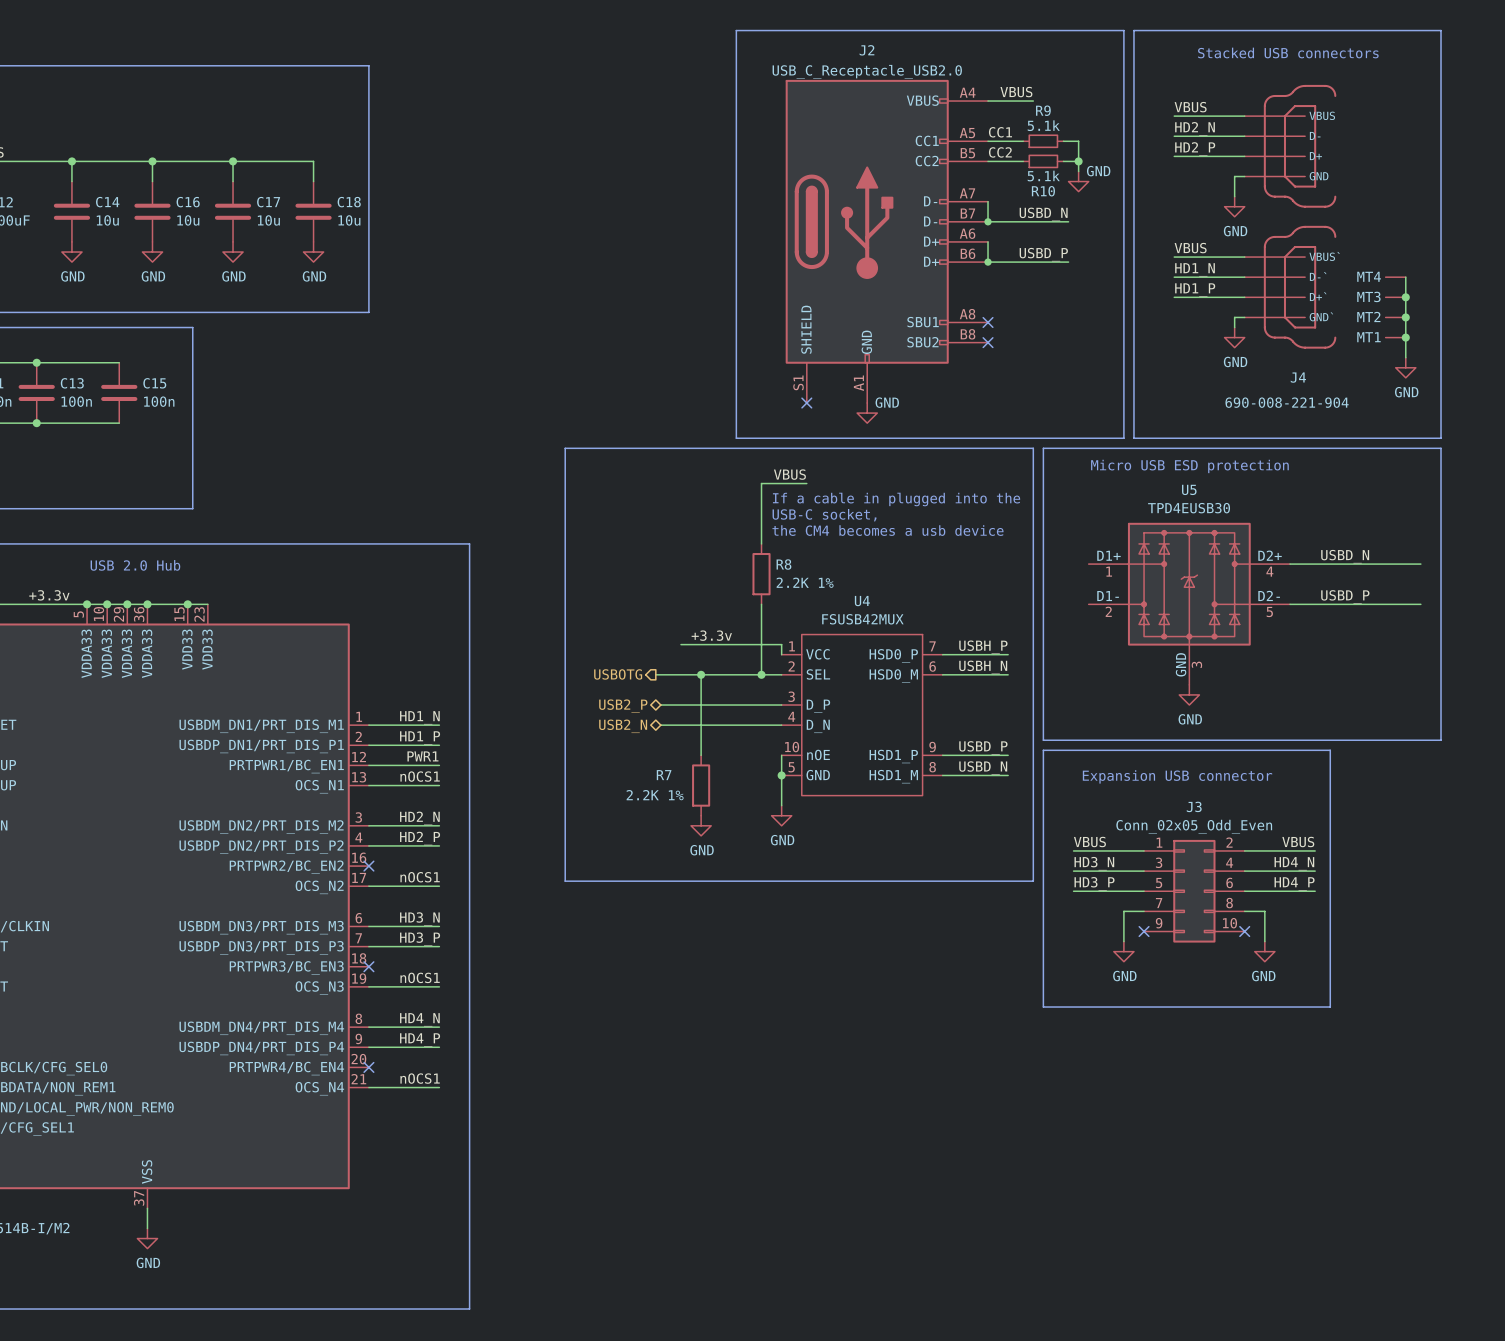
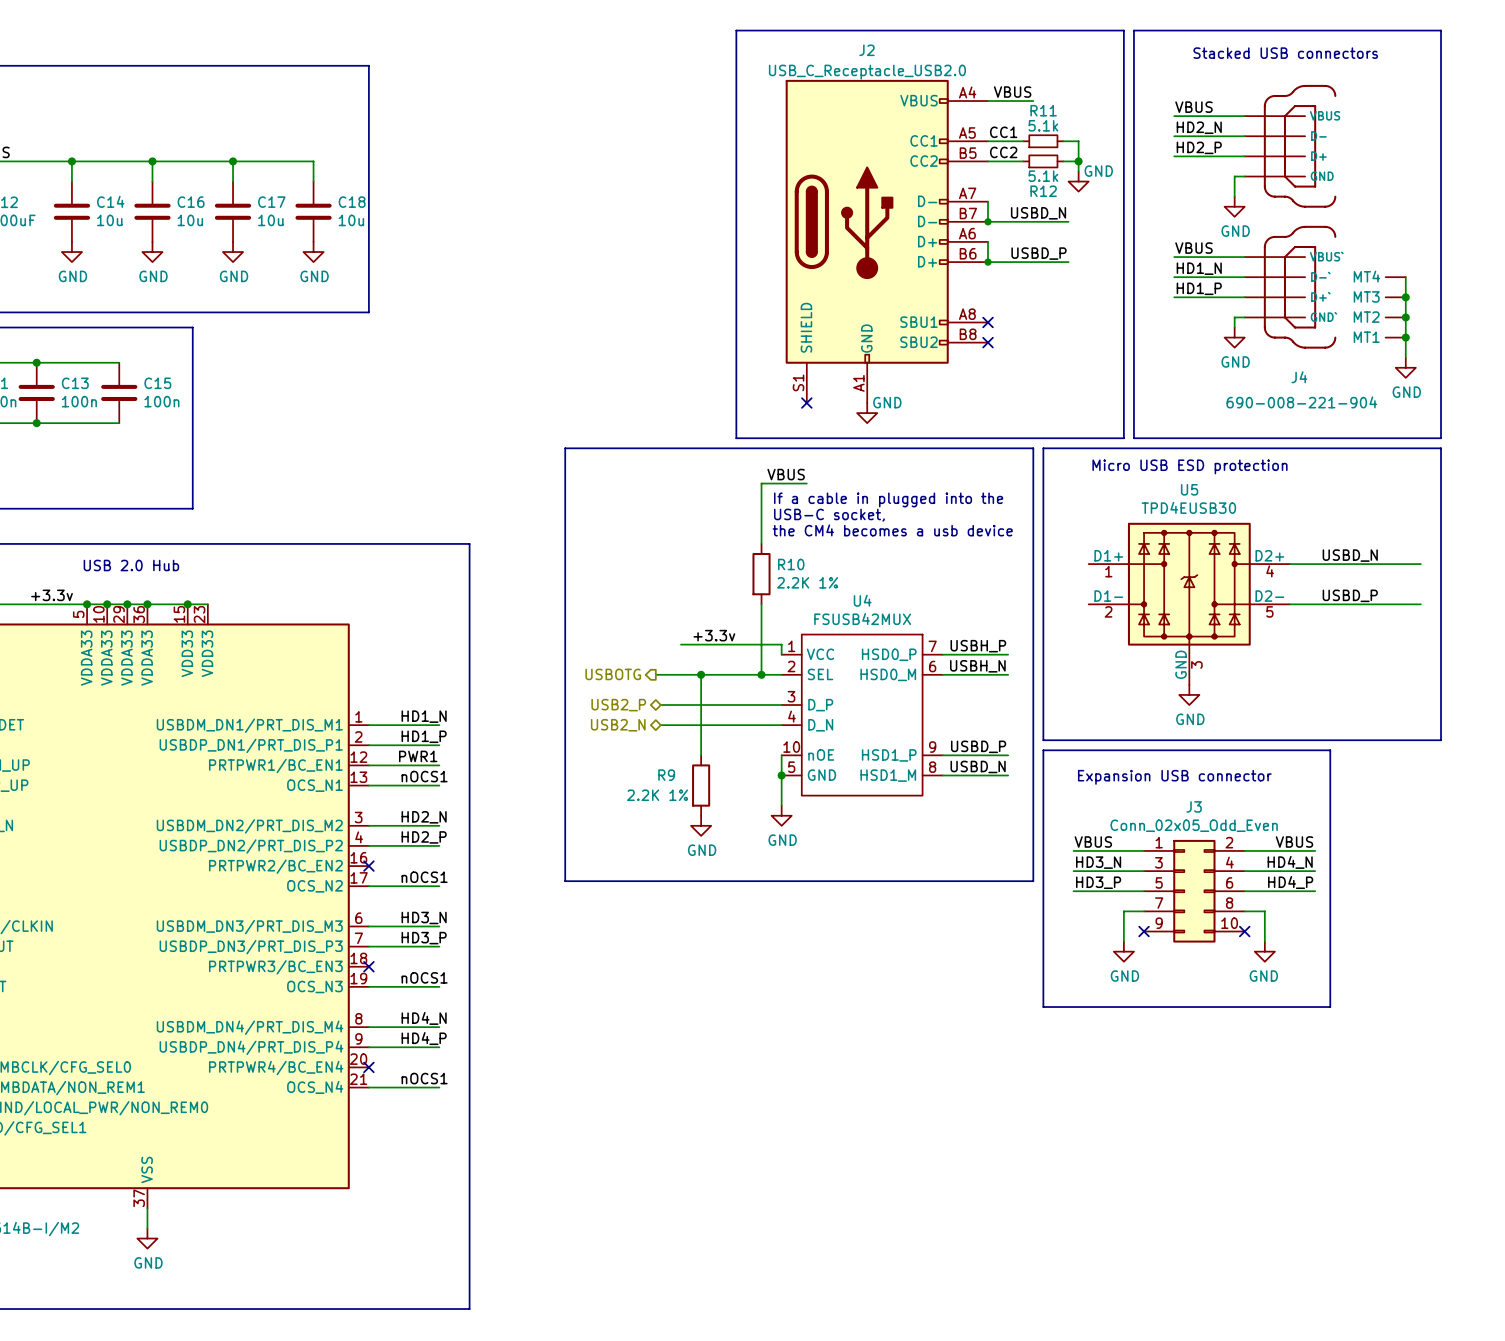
R9 name: R9 (1043, 110) -> R11 (1043, 110)
R10 name: R10 (1043, 191) -> R12 (1043, 191)
R8 name: R8 (783, 564) -> R10 (791, 564)
R7 name: R7 (664, 775) -> R9 (666, 775)

